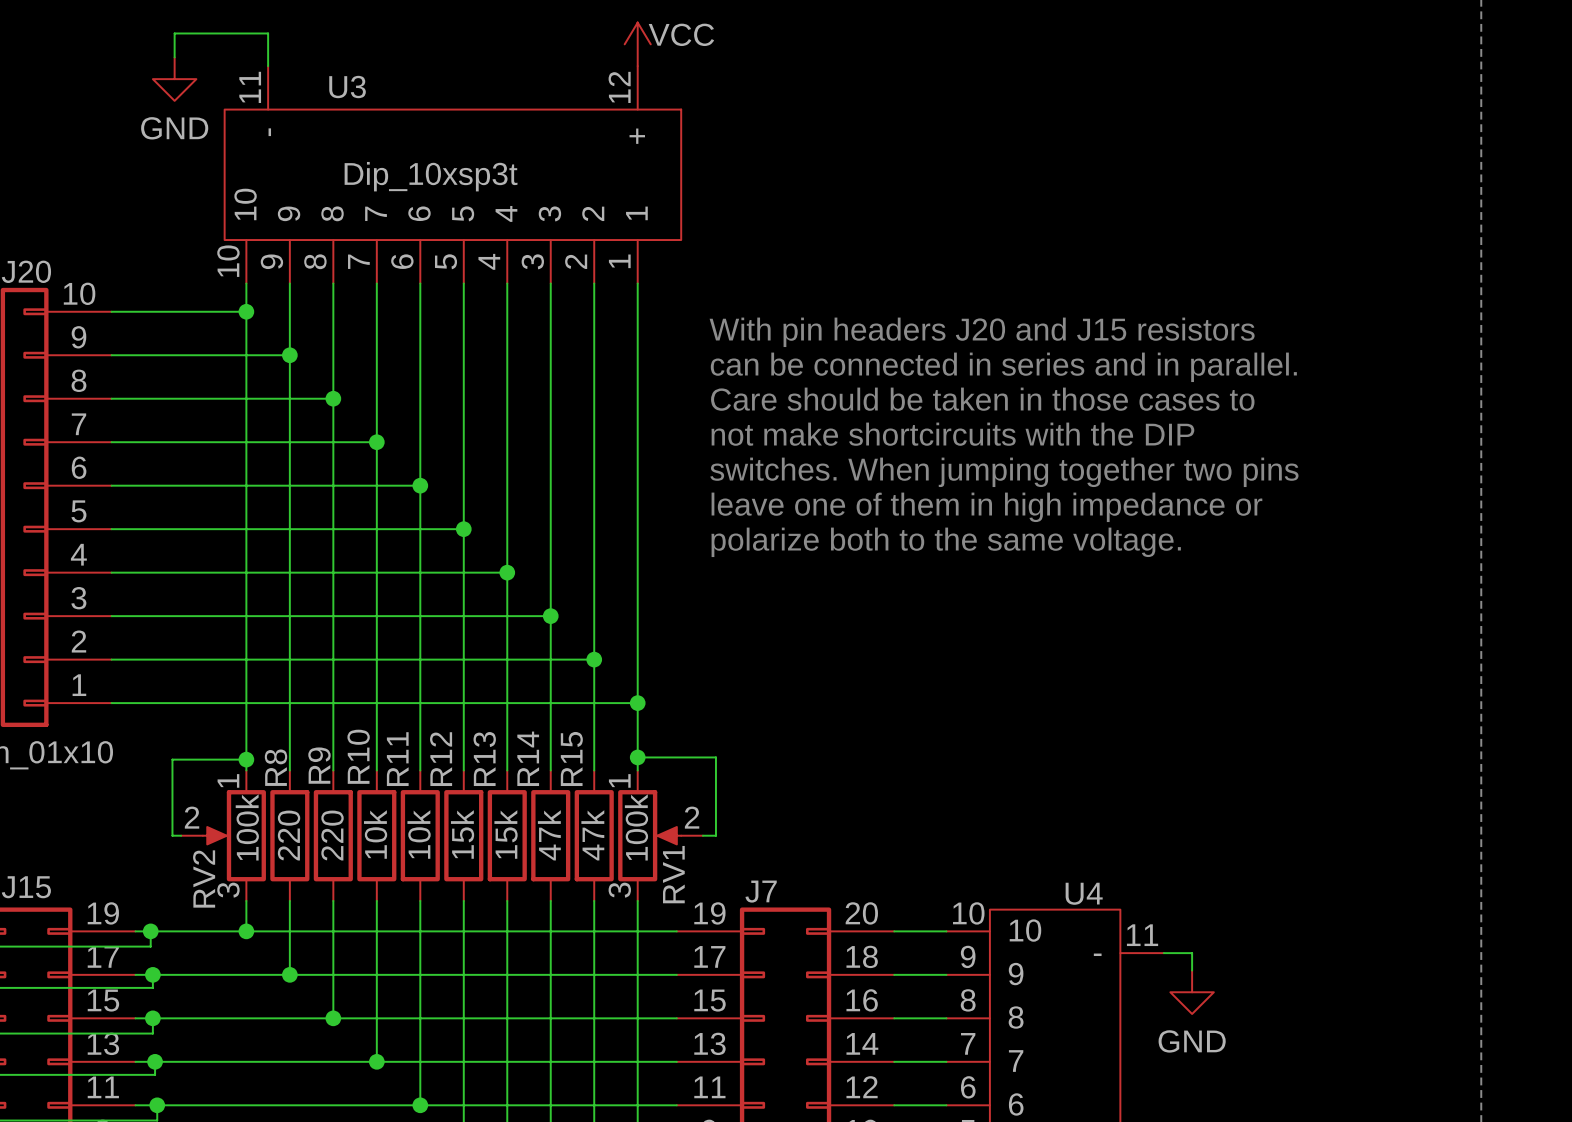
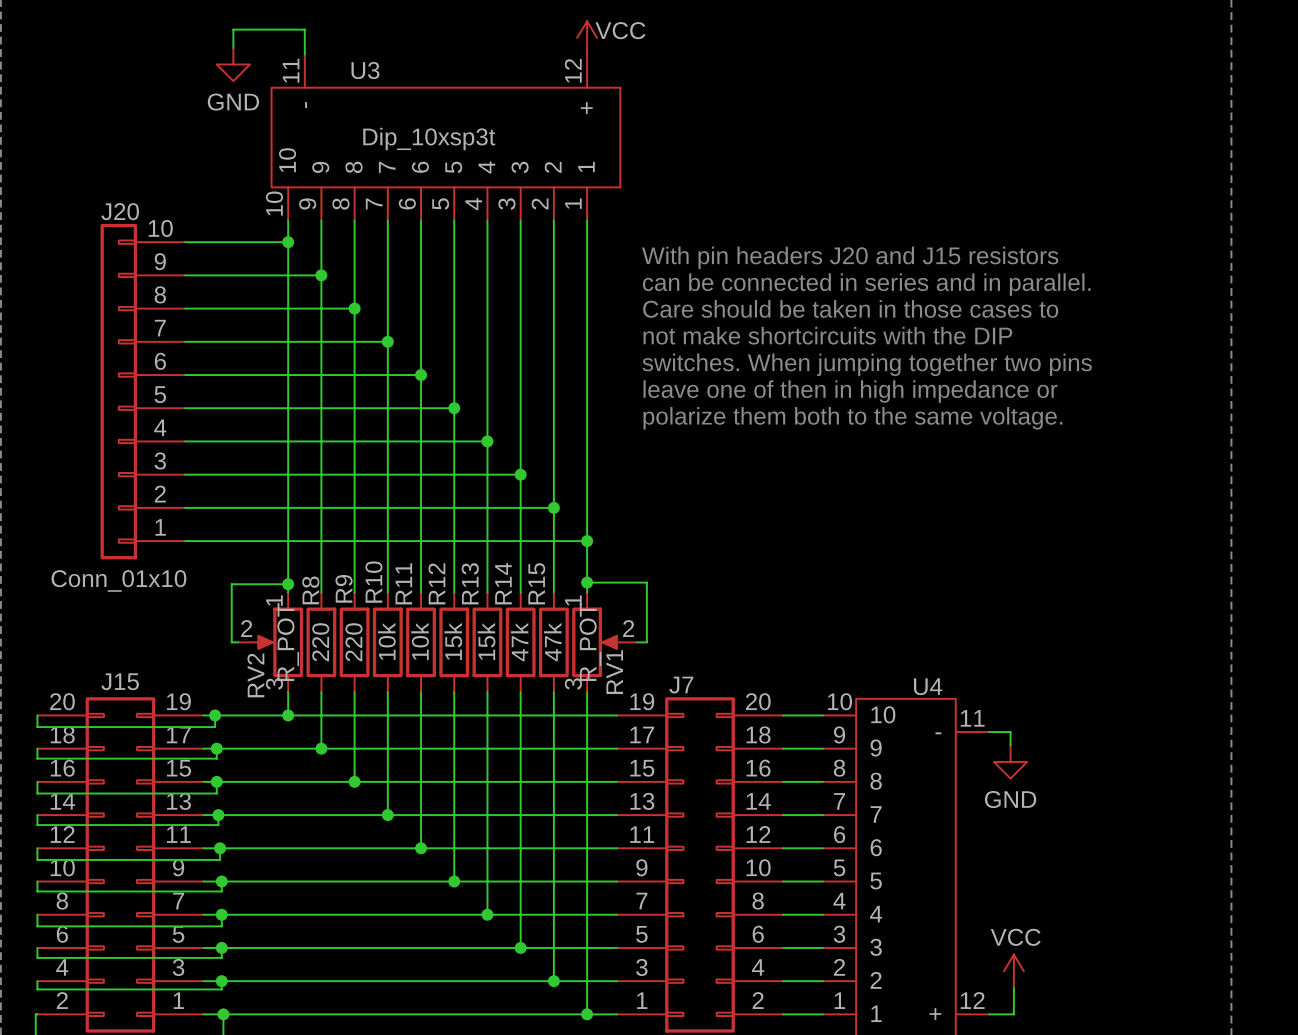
text: leave one of them in high impedance or (986, 507) -> leave one of then in high impedance or (850, 391)
text: polarize both to the same voltage. (946, 542) -> polarize them both to the same voltage. (852, 418)
RV2 value: 100k (247, 827) -> R_POT (288, 642)
RV1 value: 100k (636, 827) -> R_POT (590, 642)

